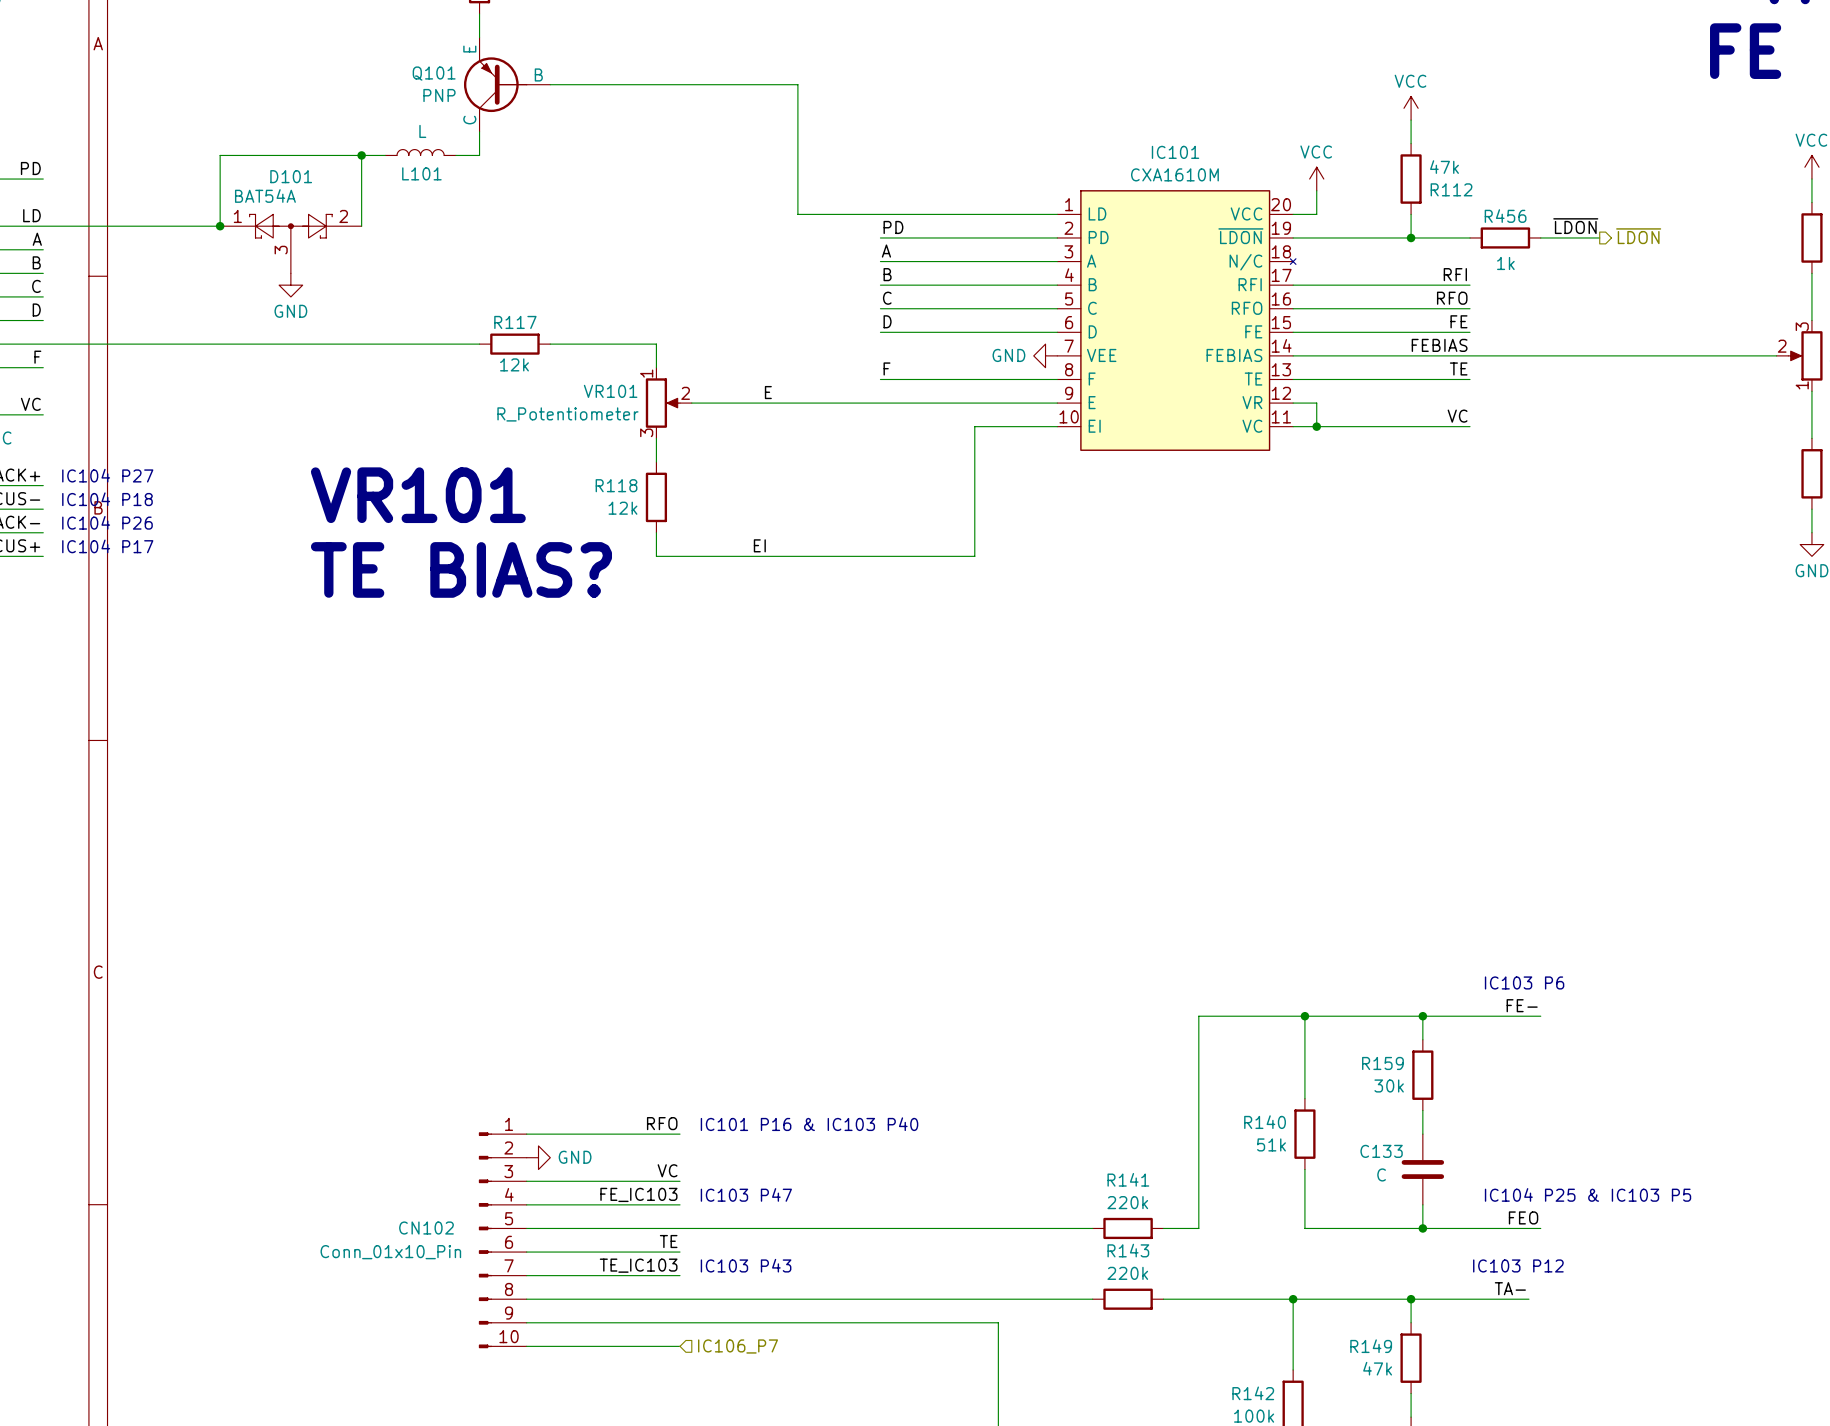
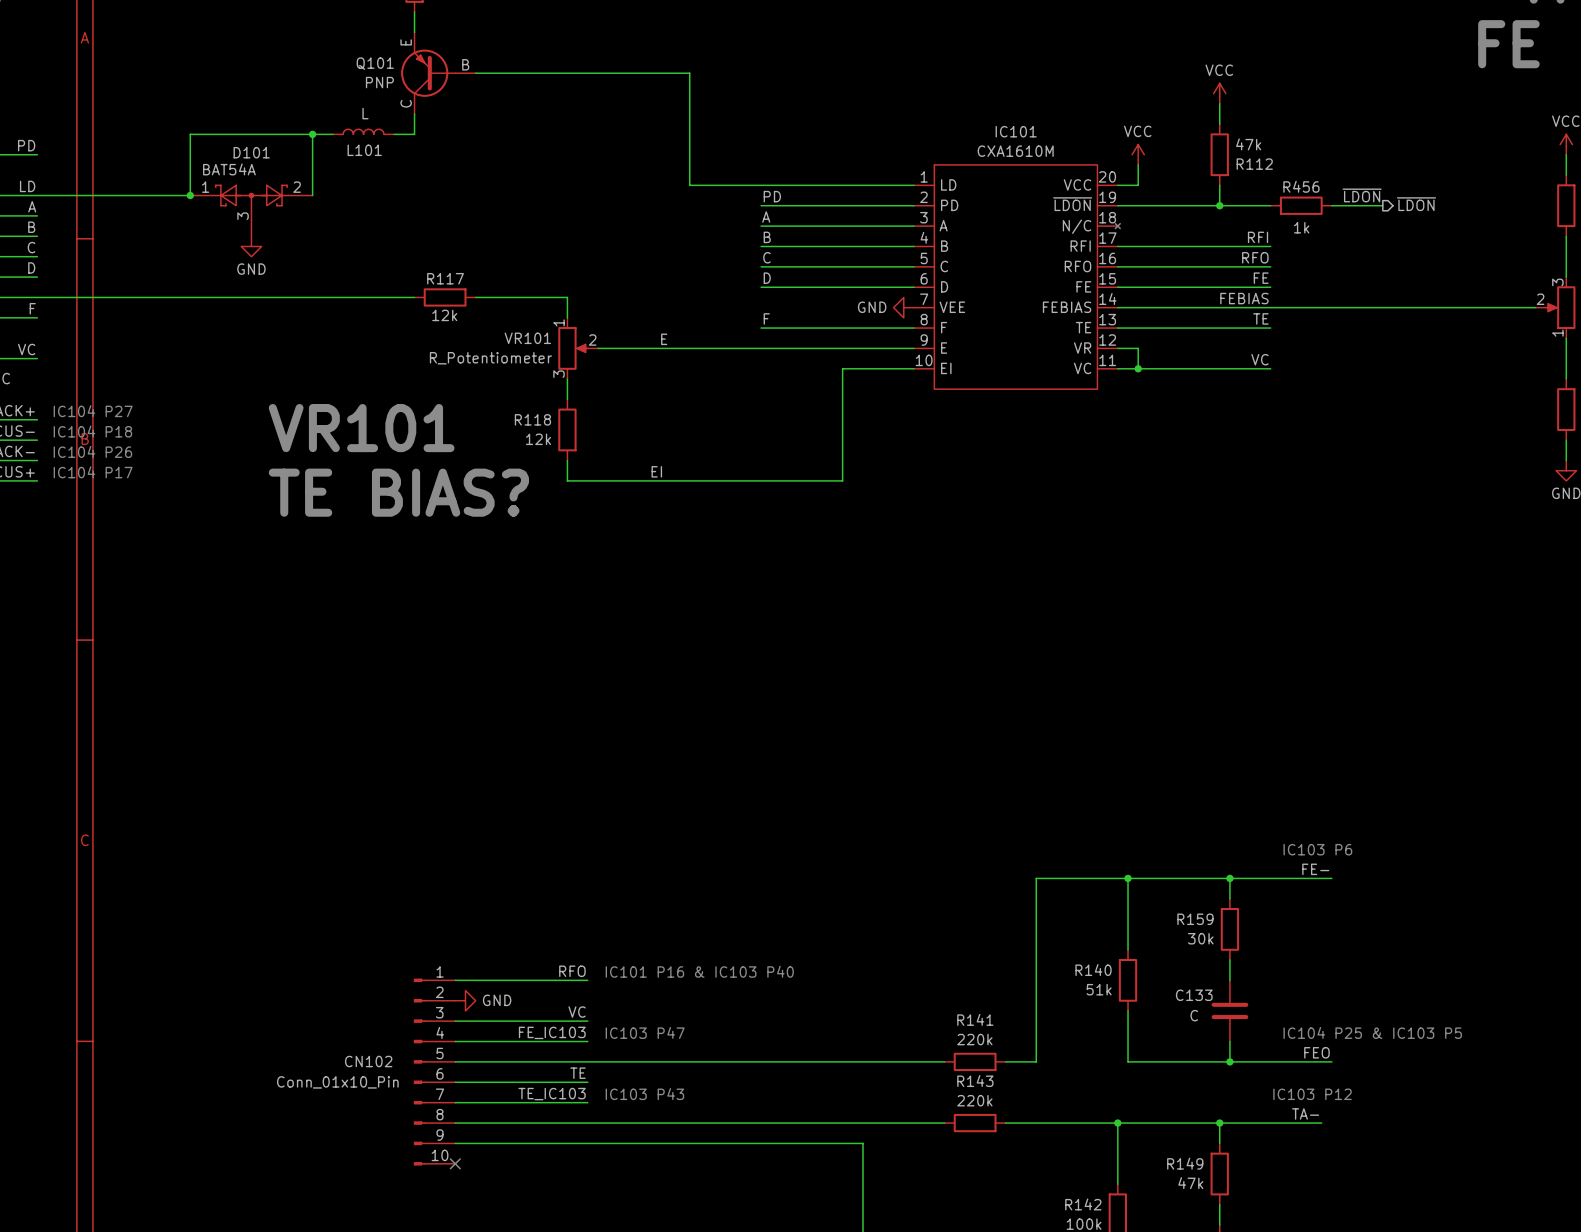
wire: (526, 1346) (680, 1346) -> none
no-connect mark: none -> (455, 1163)
hierarchical label: IC106_P7 (738, 1346) -> none

